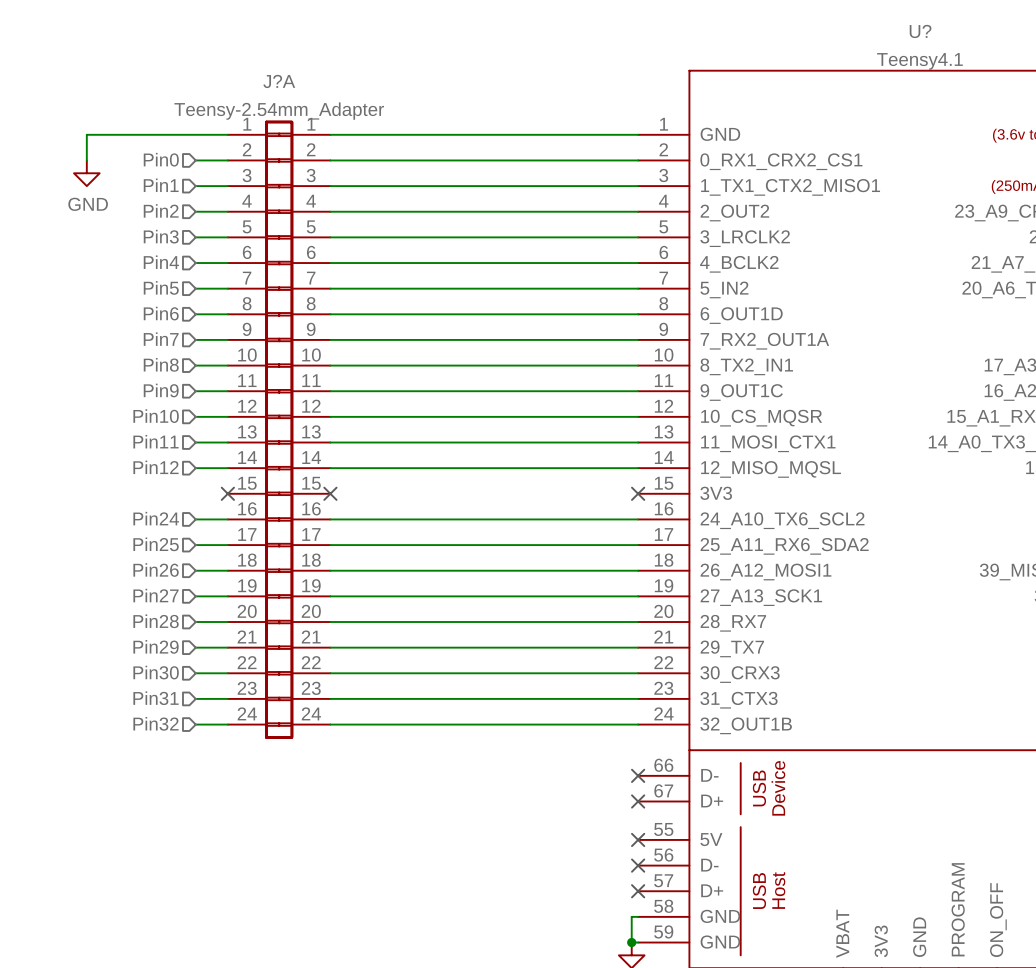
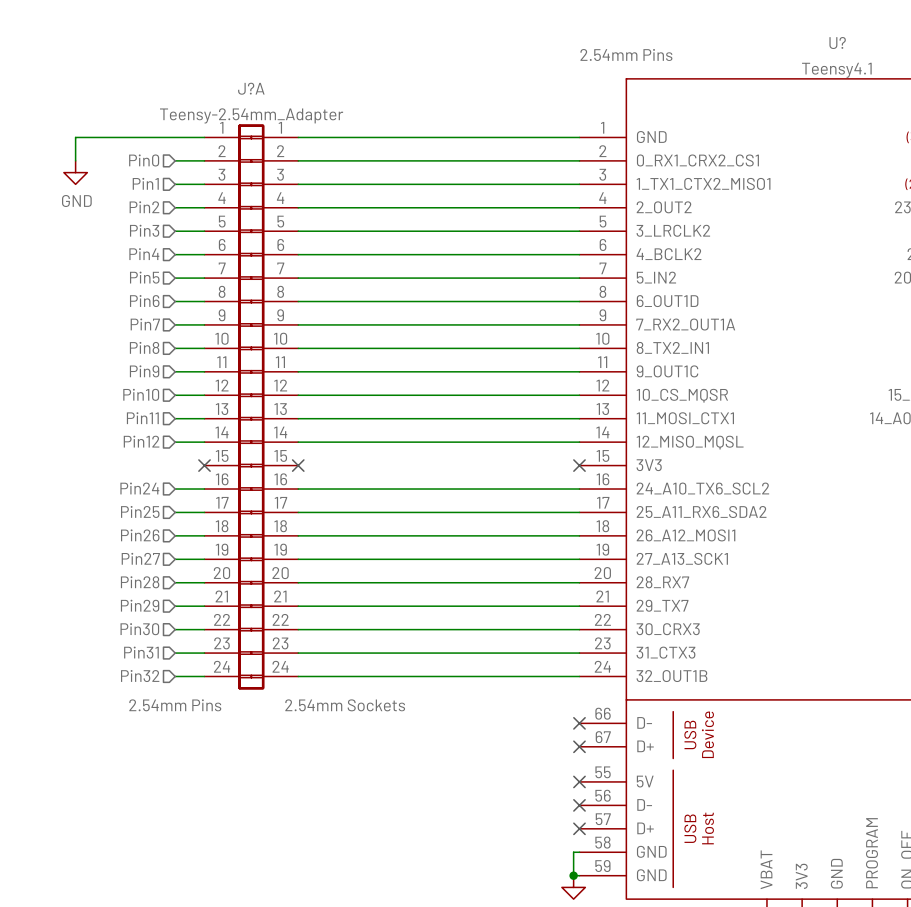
U? text: none -> 2.54mm Pins (626, 54)
J?A text: none -> 2.54mm Pins (175, 705)
J?A text: none -> 2.54mm Sockets (345, 705)

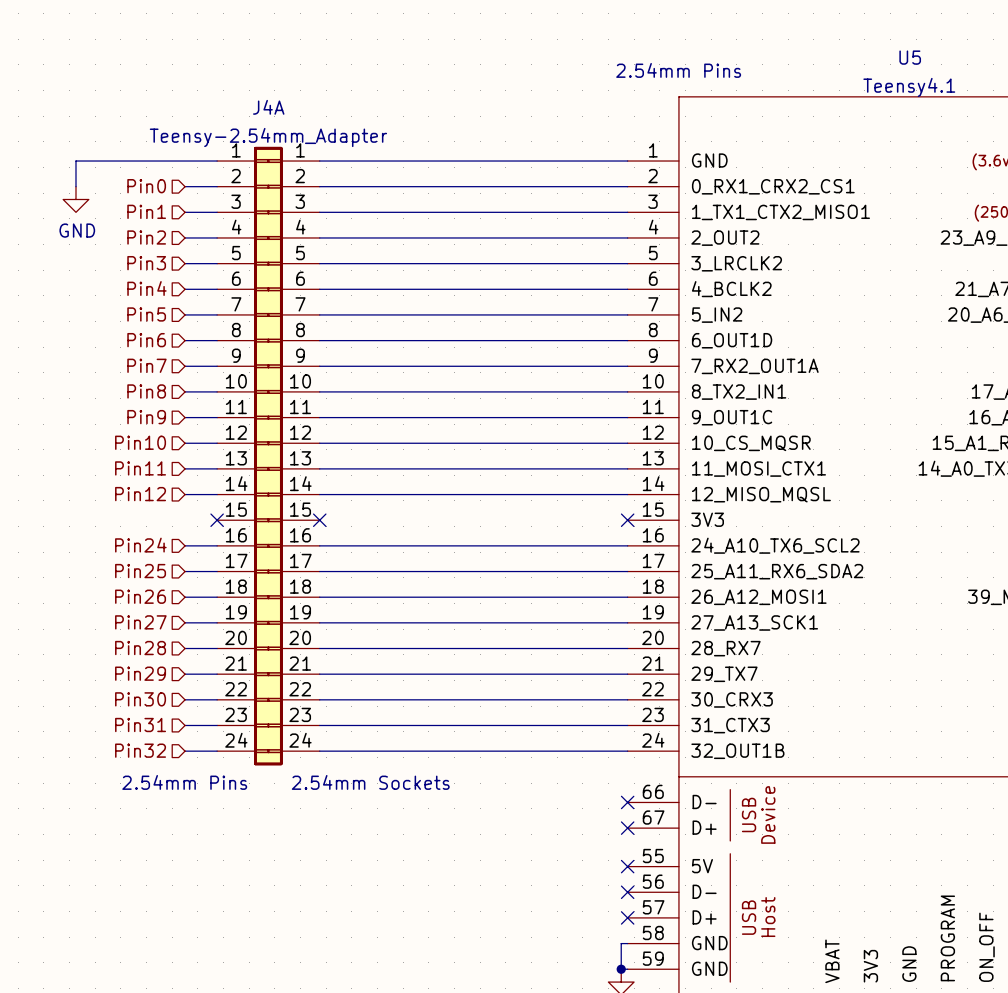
U? name: U? (837, 43) -> U5 (910, 57)
J?A name: J?A (251, 88) -> J4A (268, 107)

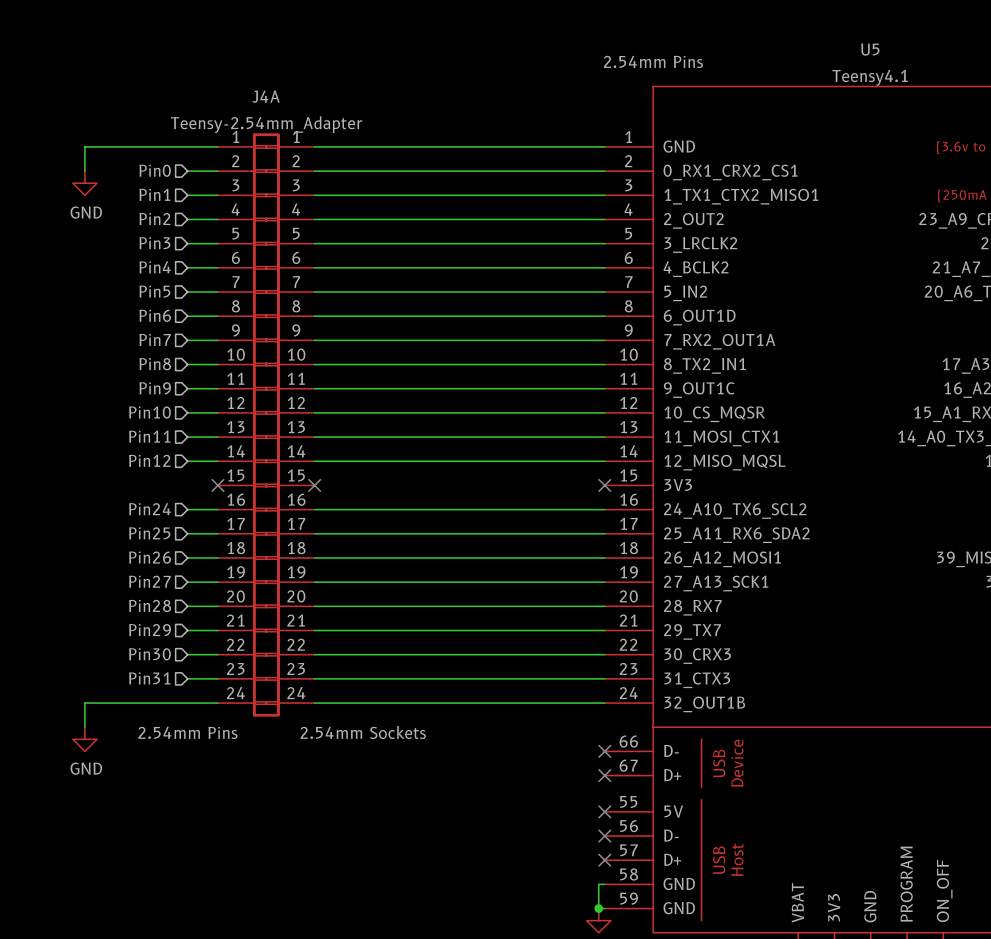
hierarchical label: Pin32 (140, 750) -> none
wire: none -> (187, 703) (84, 703) (84, 727)
power symbol: none -> GND (84, 739)

